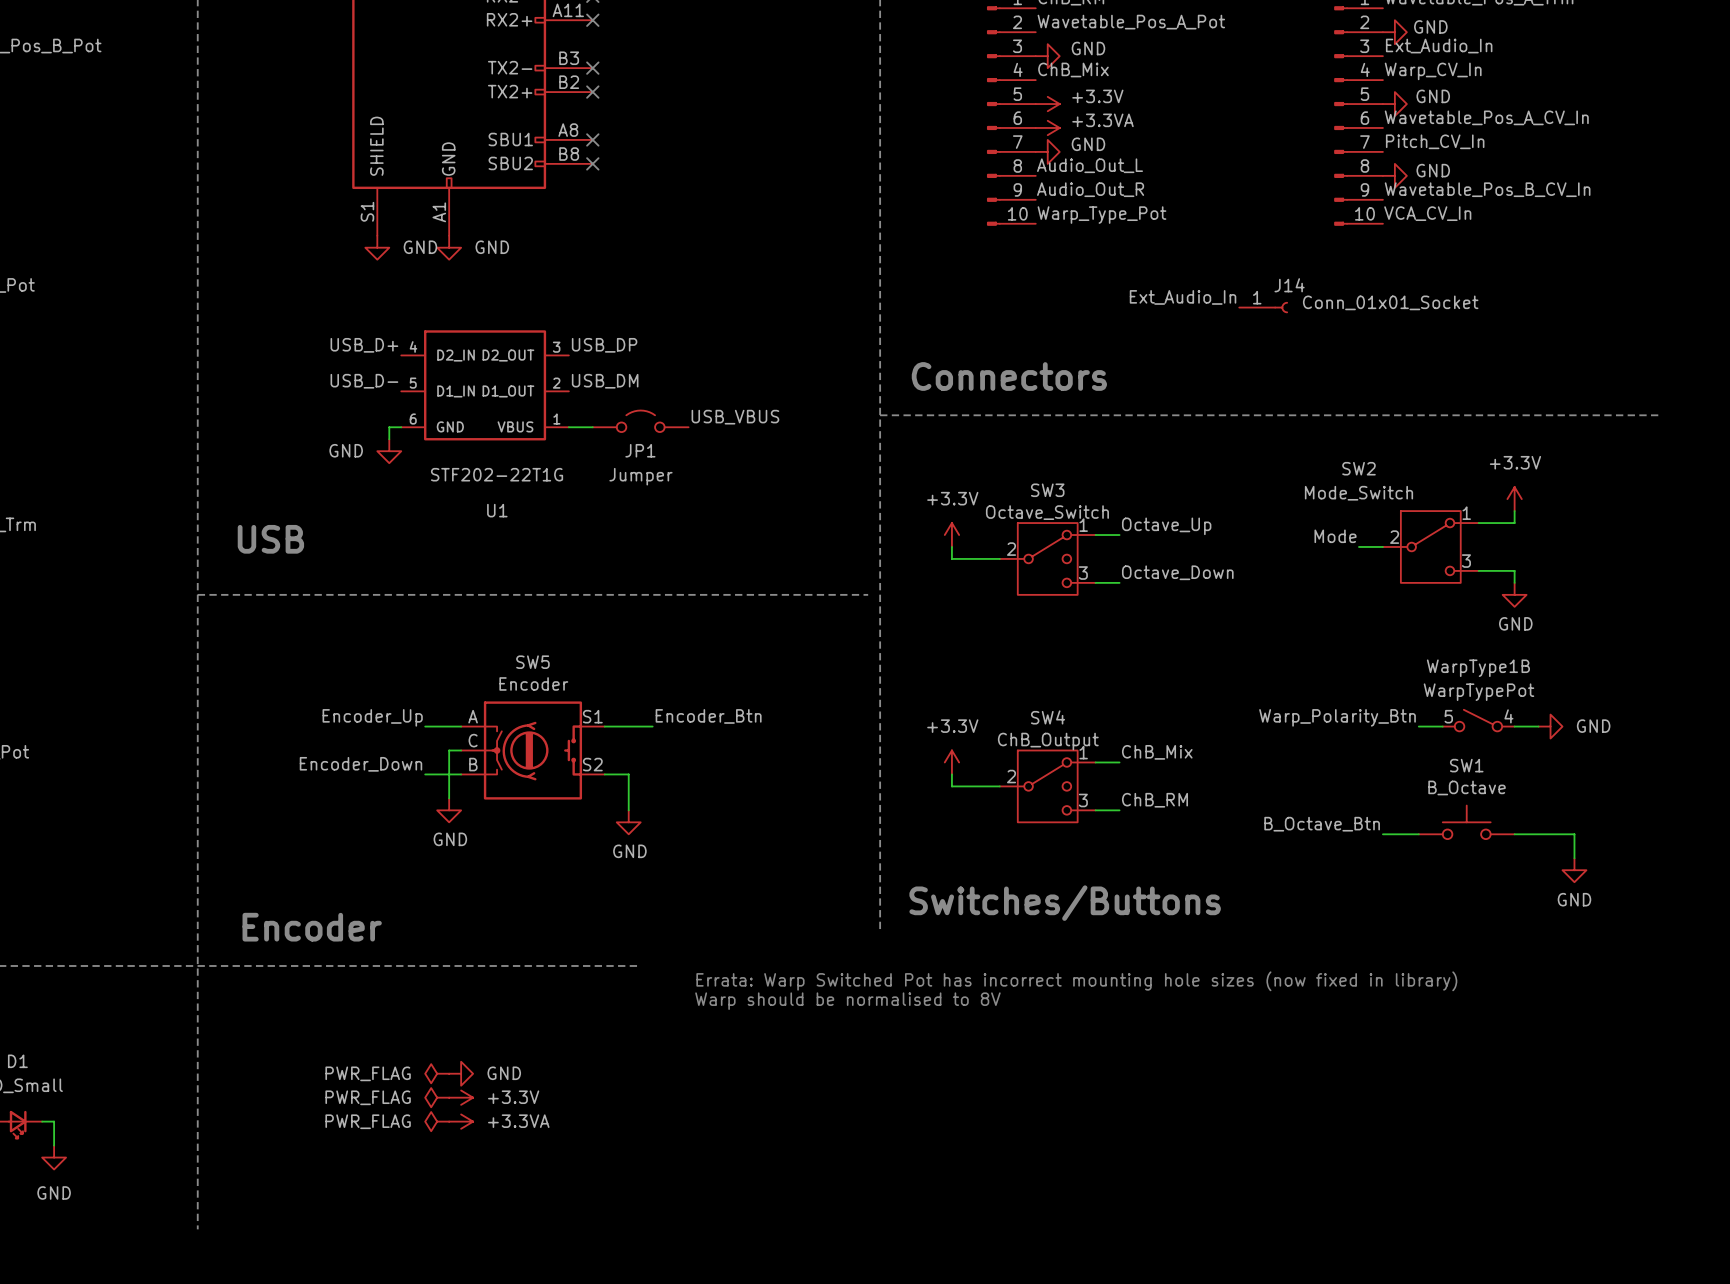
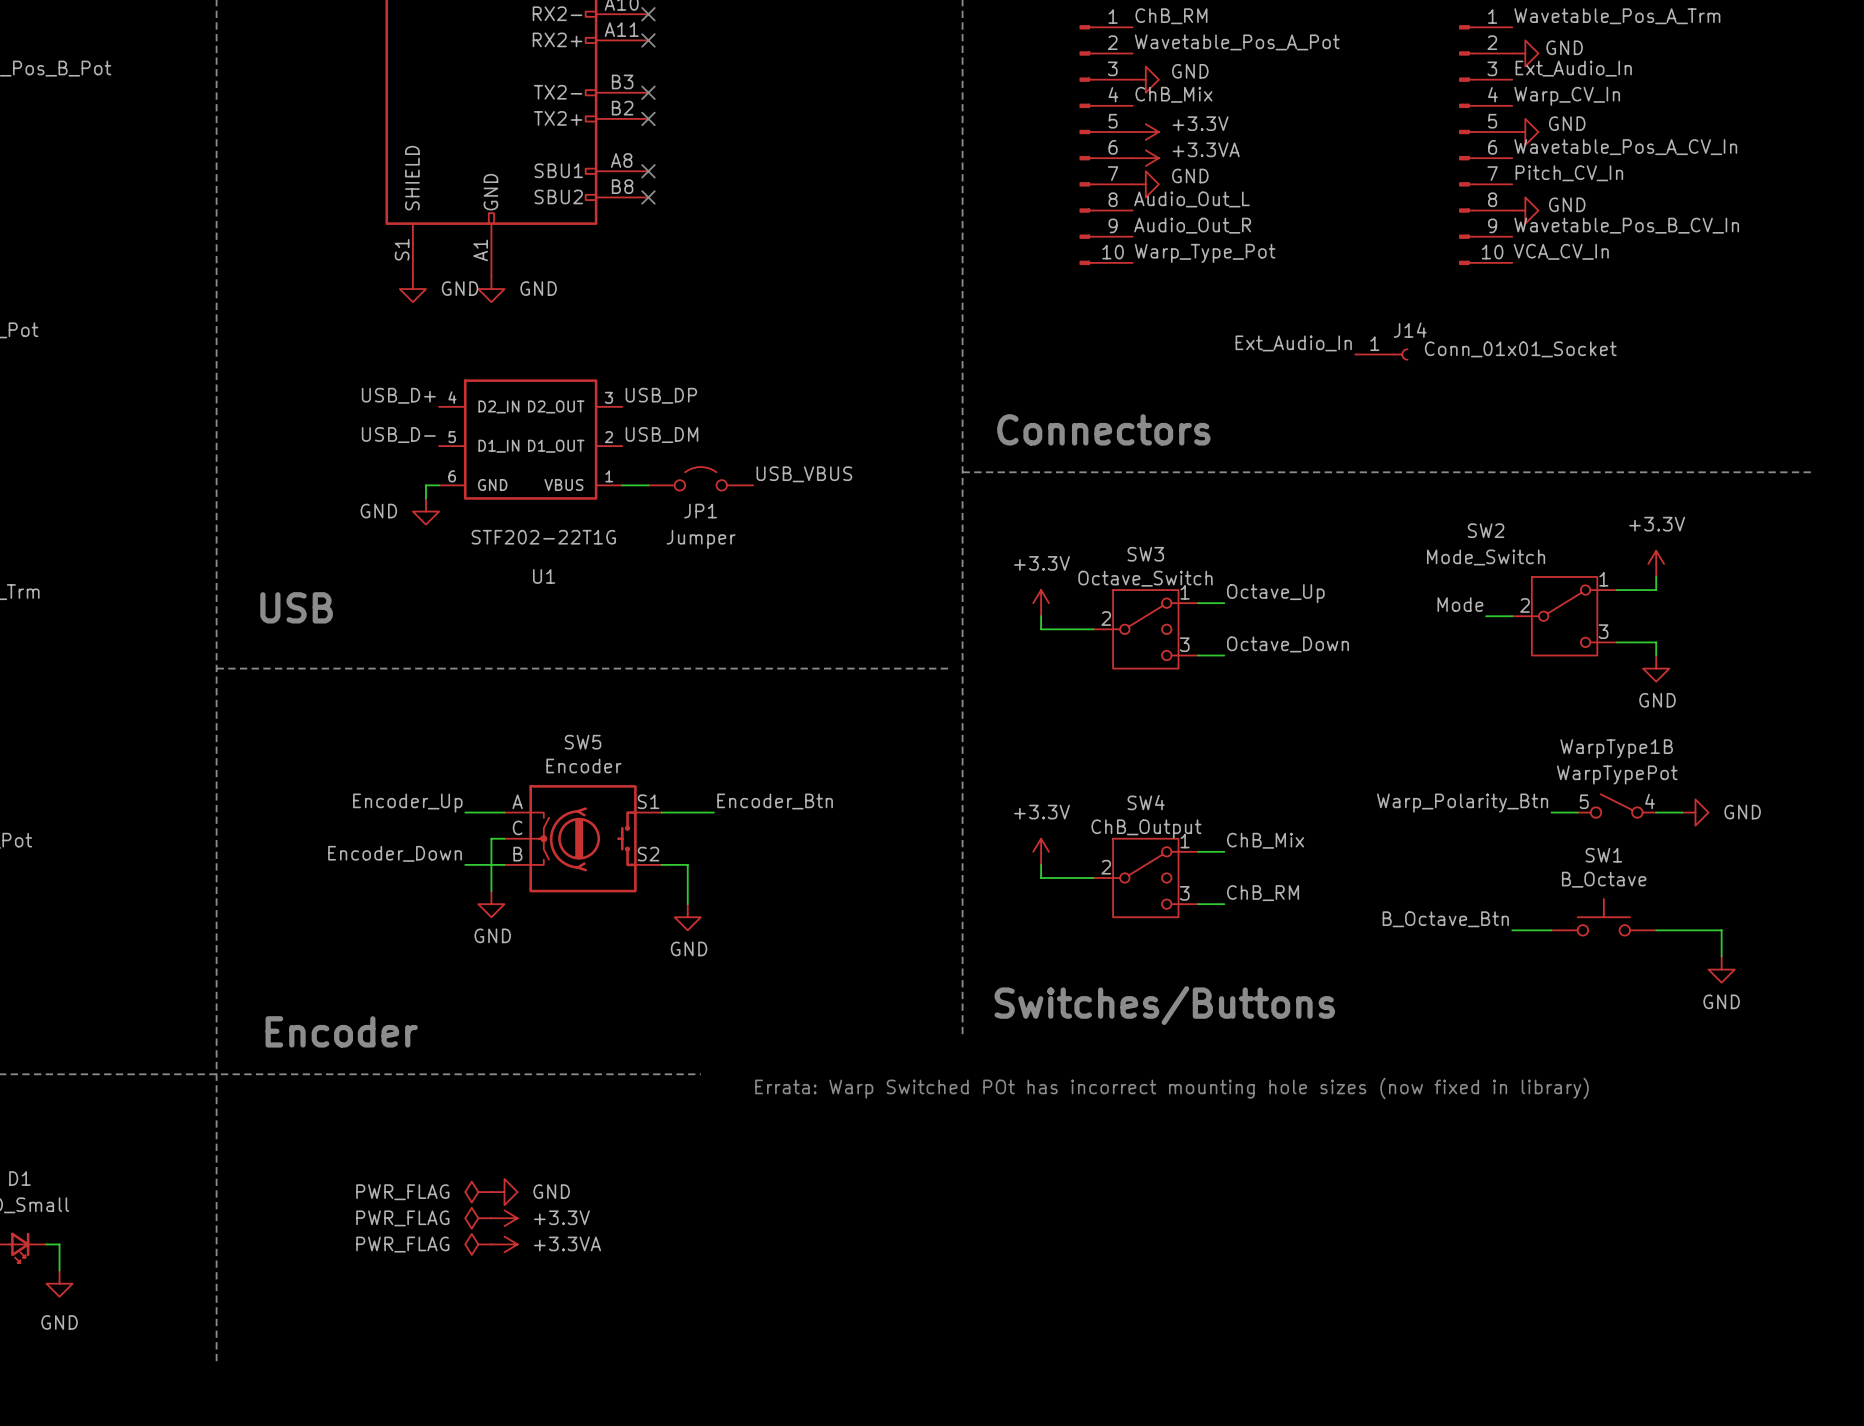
text: none -> Errata: Warp Switched POt has incorrect mounting hole sizes (now fixed in library) (1171, 1088)
text: Errata: Warp Switched Pot has incorrect mounting hole sizes (now fixed in library) (1076, 981) -> none
text: Warp should be normalised to 8V (847, 1001) -> none

